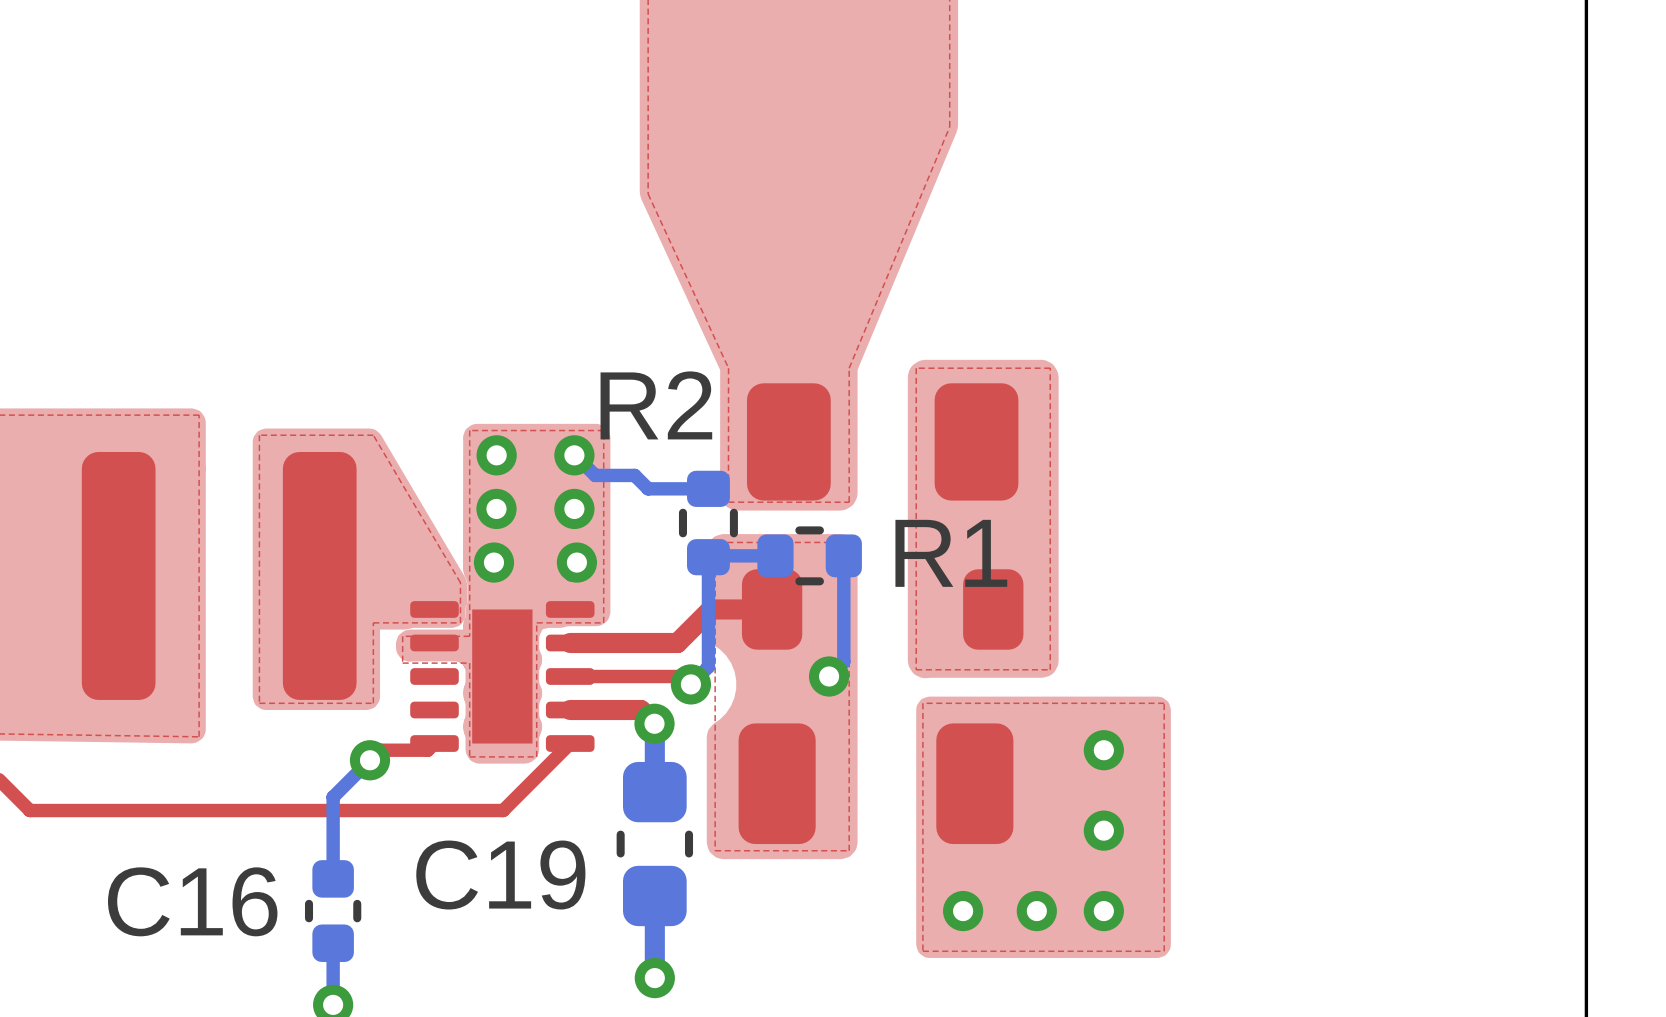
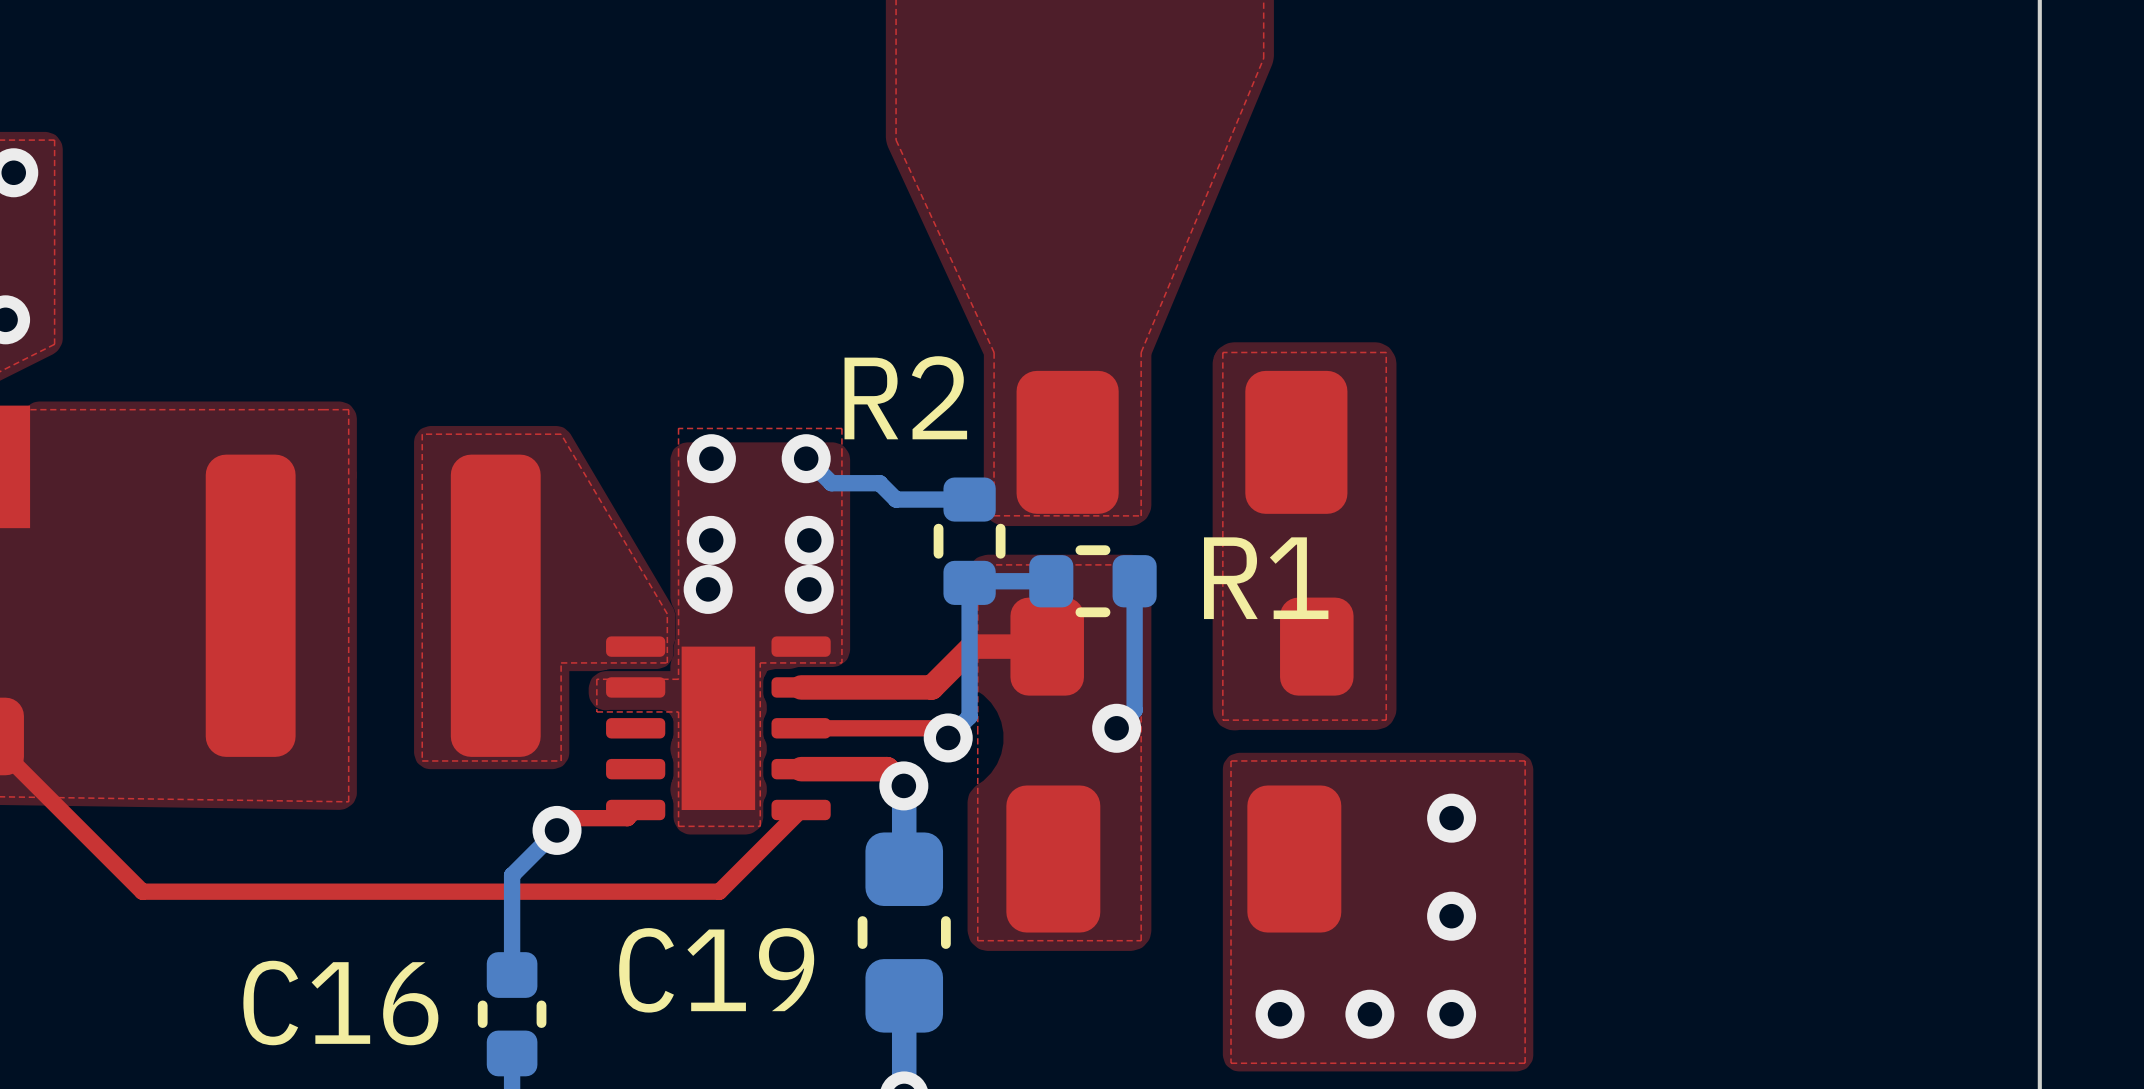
via position: (496, 508) -> (711, 540)
via position: (574, 508) -> (809, 540)

